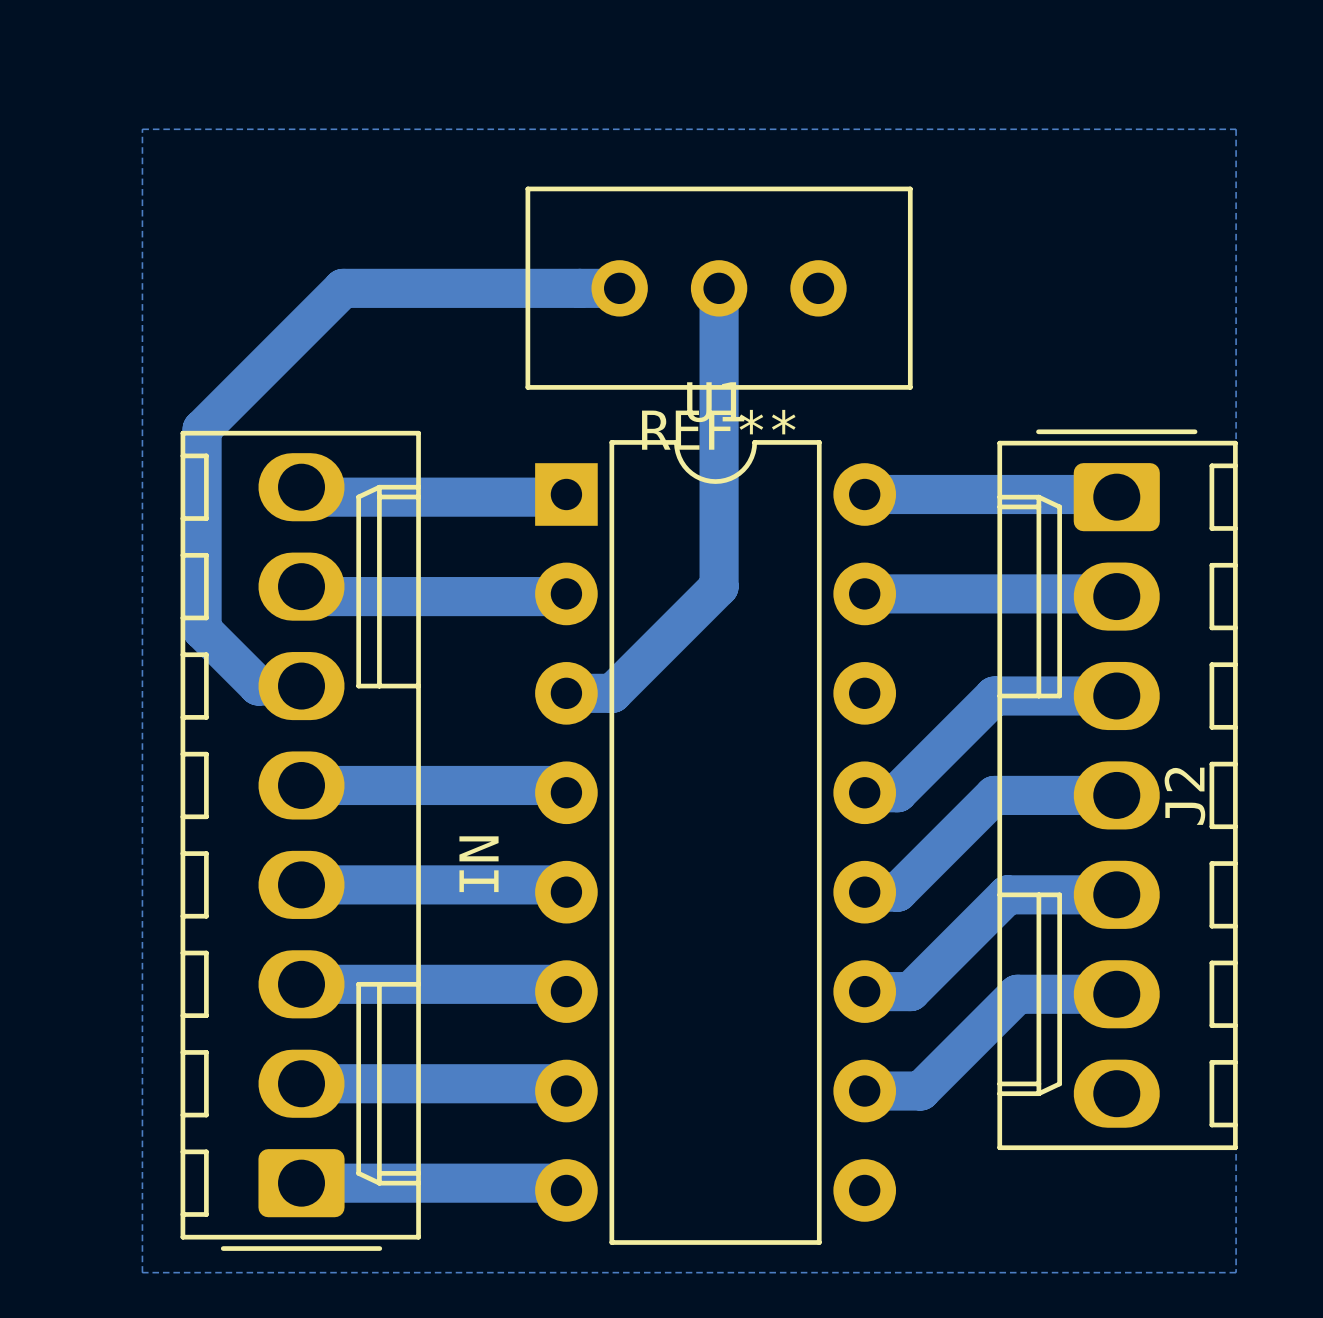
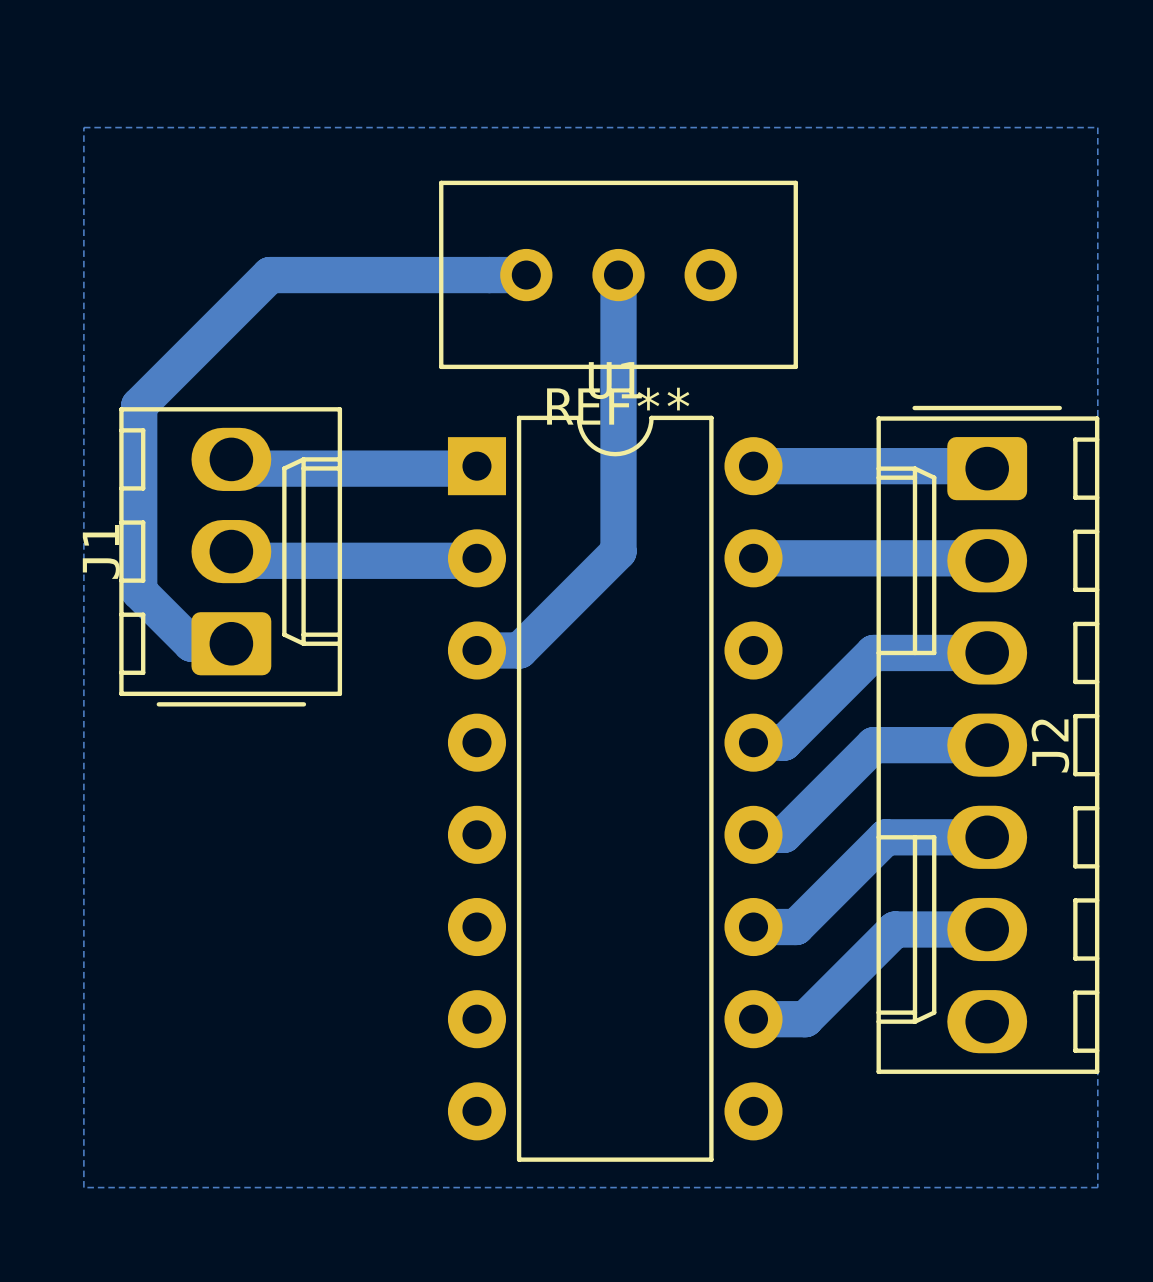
J1: none -> (230, 556)
bottom track: (301, 785) (559, 785) (566, 792) -> none
IN: (300, 840) -> none
bottom track: (301, 884) (559, 884) (566, 892) -> none
bottom track: (301, 984) (559, 984) (566, 991) -> none
bottom track: (301, 1083) (559, 1083) (566, 1091) -> none
bottom track: (301, 1183) (559, 1183) (566, 1190) -> none

